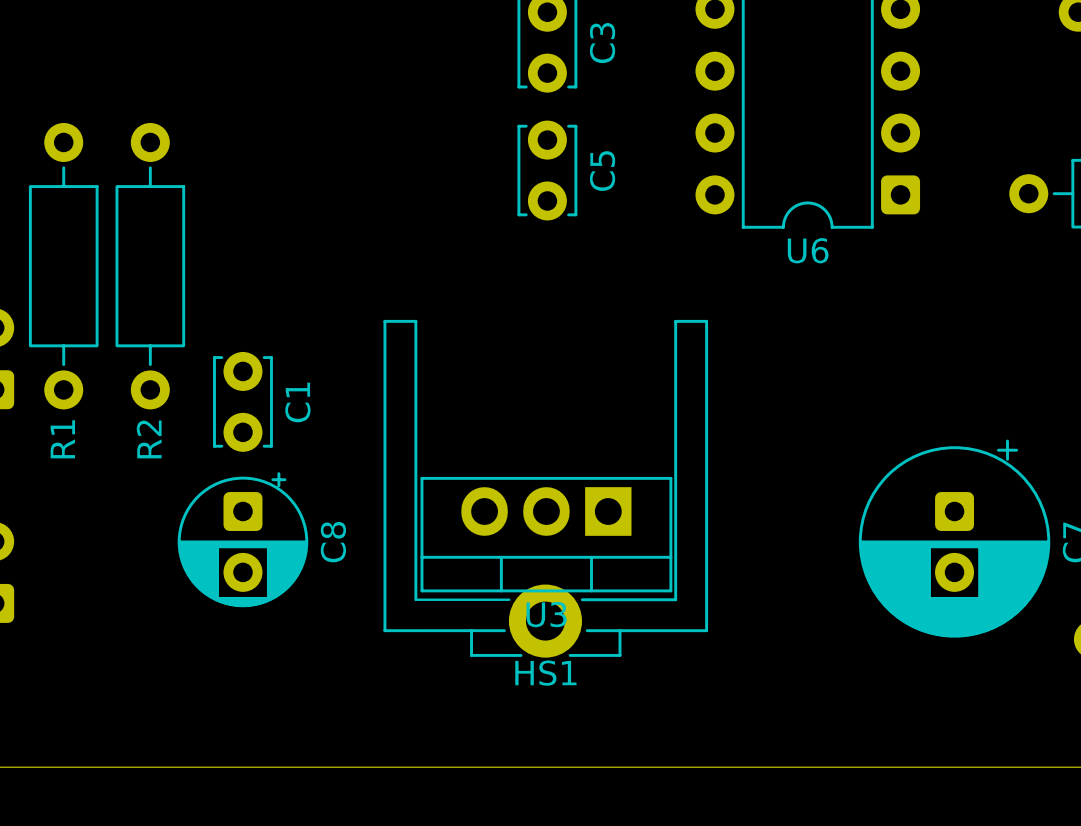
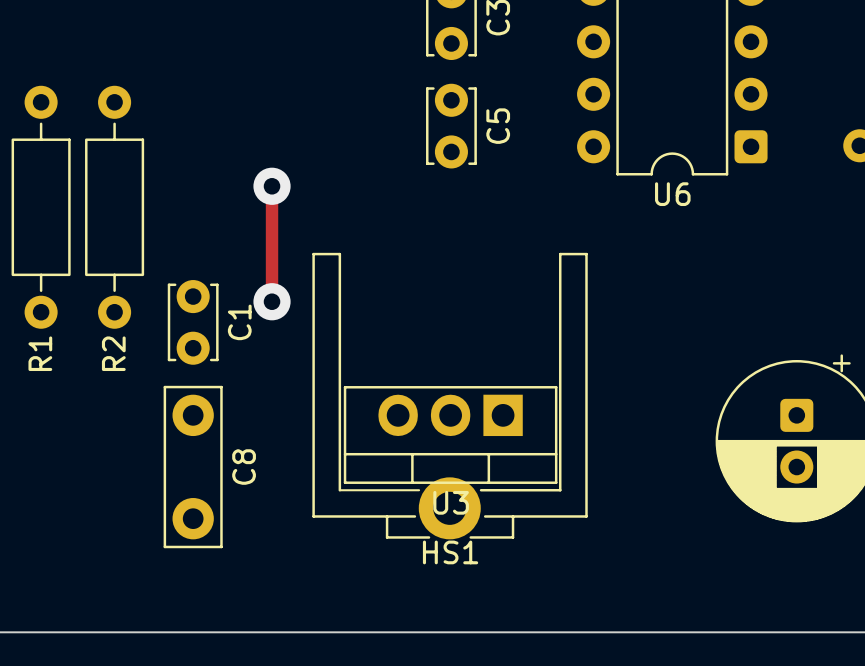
track: none -> (272, 186) (272, 301)
via: none -> (272, 186)
via: none -> (272, 301)
C8 footprint: [177, 472, 309, 608] -> [163, 385, 223, 549]

